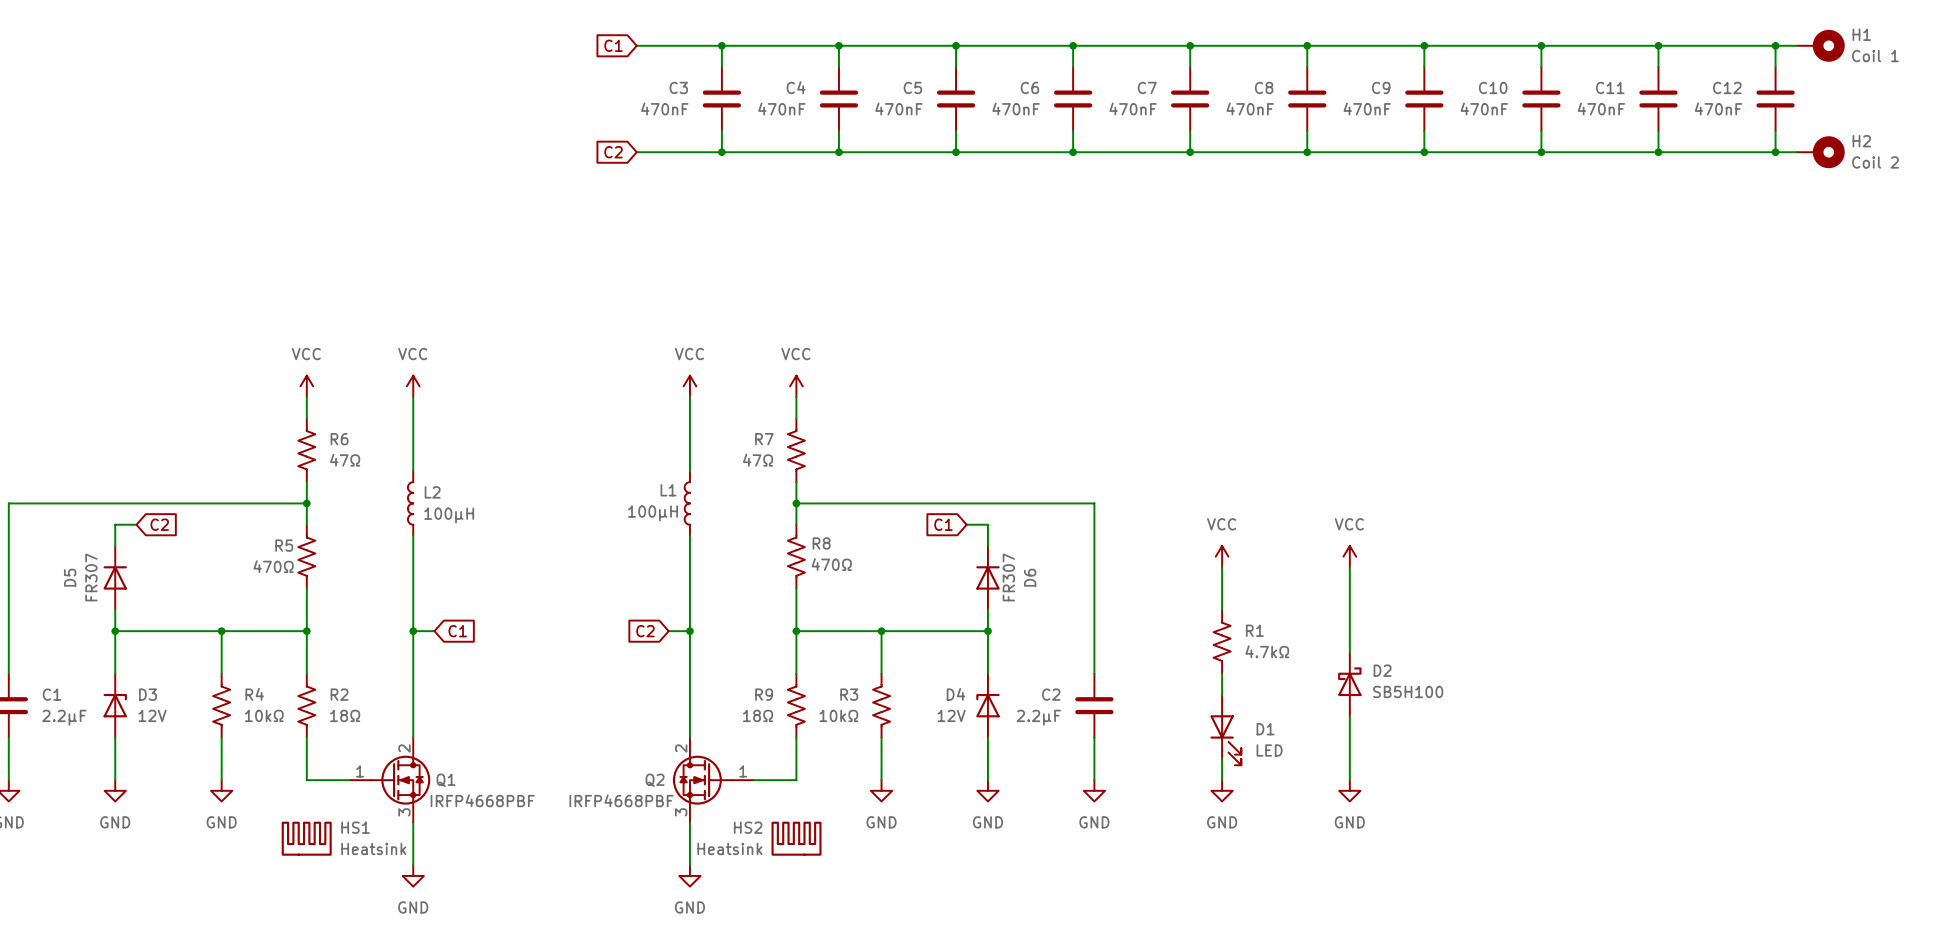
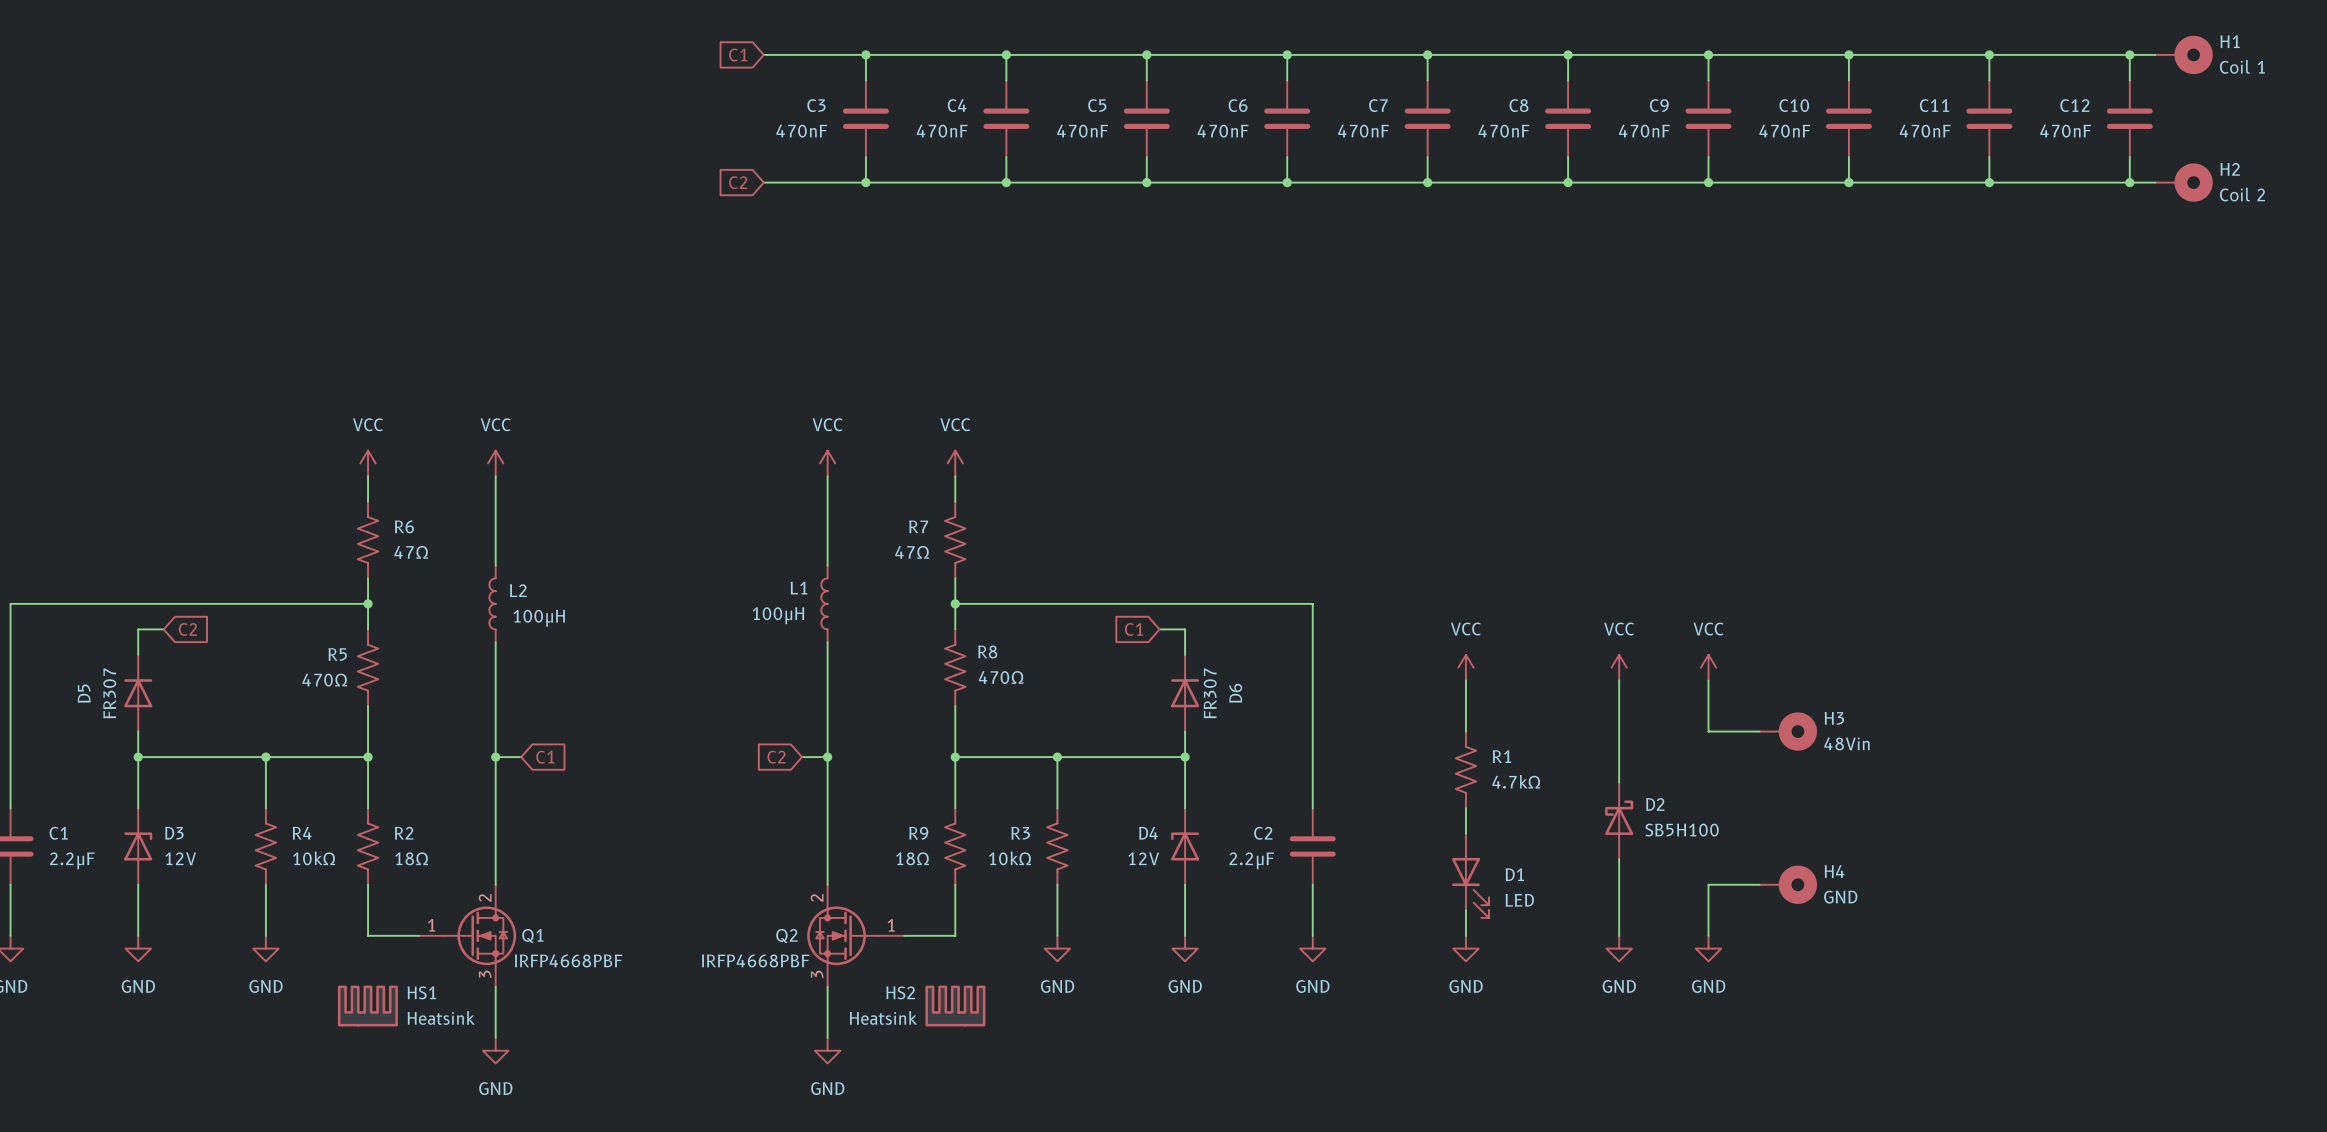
power symbol: none -> VCC (1708, 667)
wire: none -> (1708, 680) (1708, 731) (1759, 731)
H3: none -> 48Vin (1788, 731)
wire: none -> (1759, 884) (1708, 884) (1708, 935)
H4: none -> GND (1788, 884)
power symbol: none -> GND (1708, 948)

